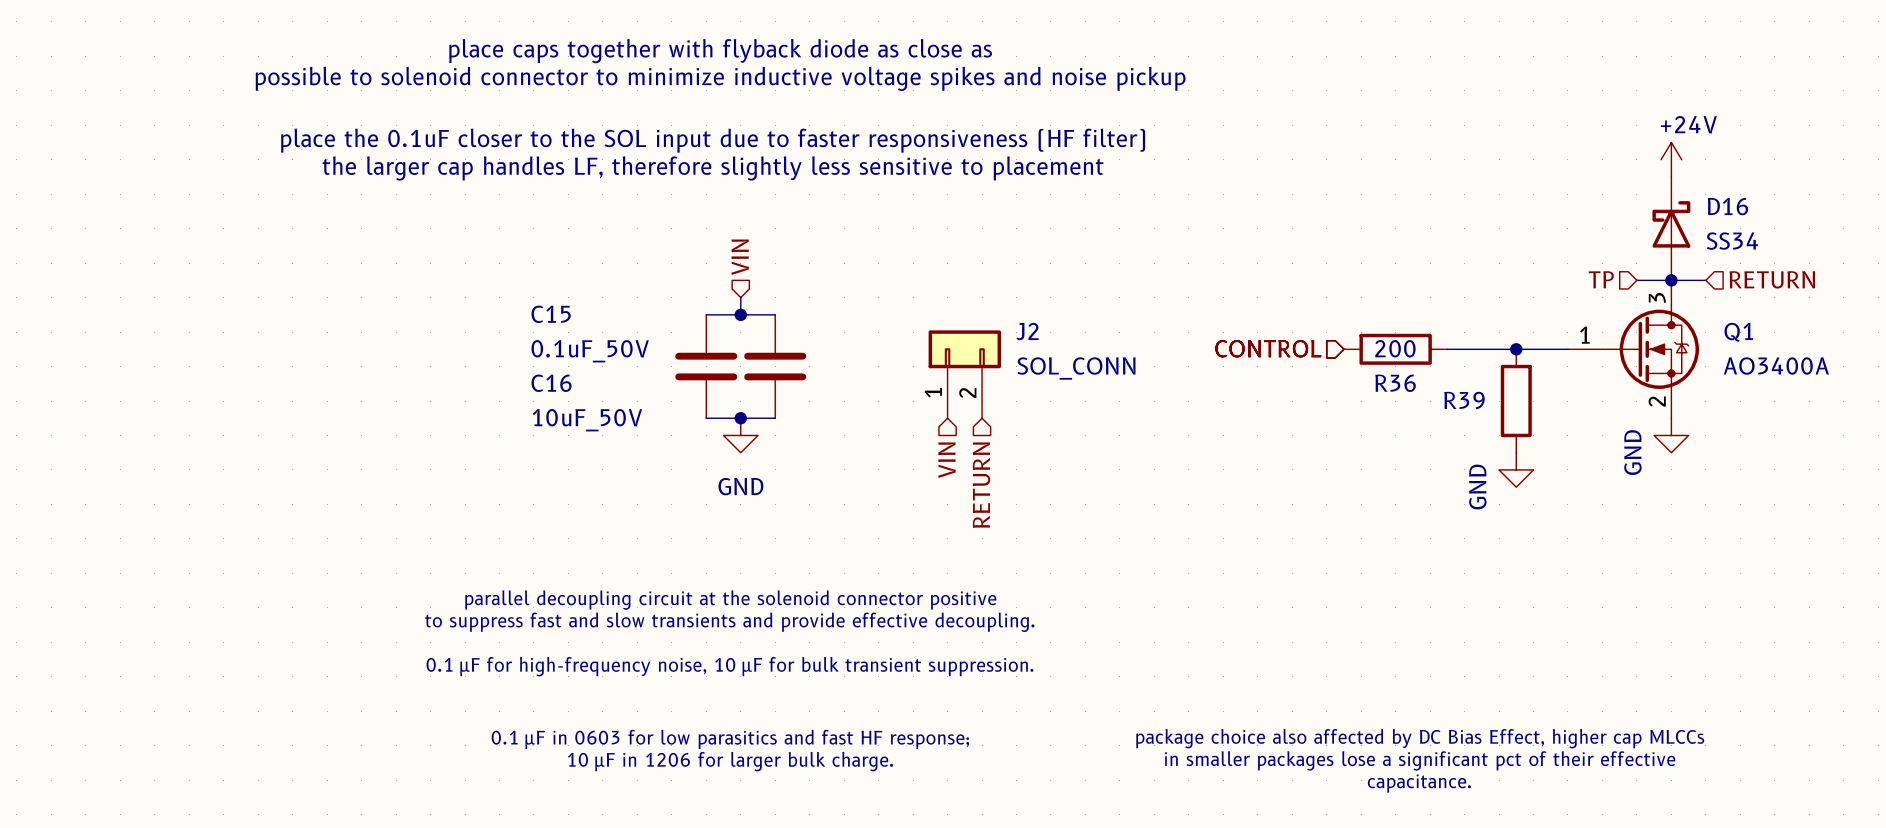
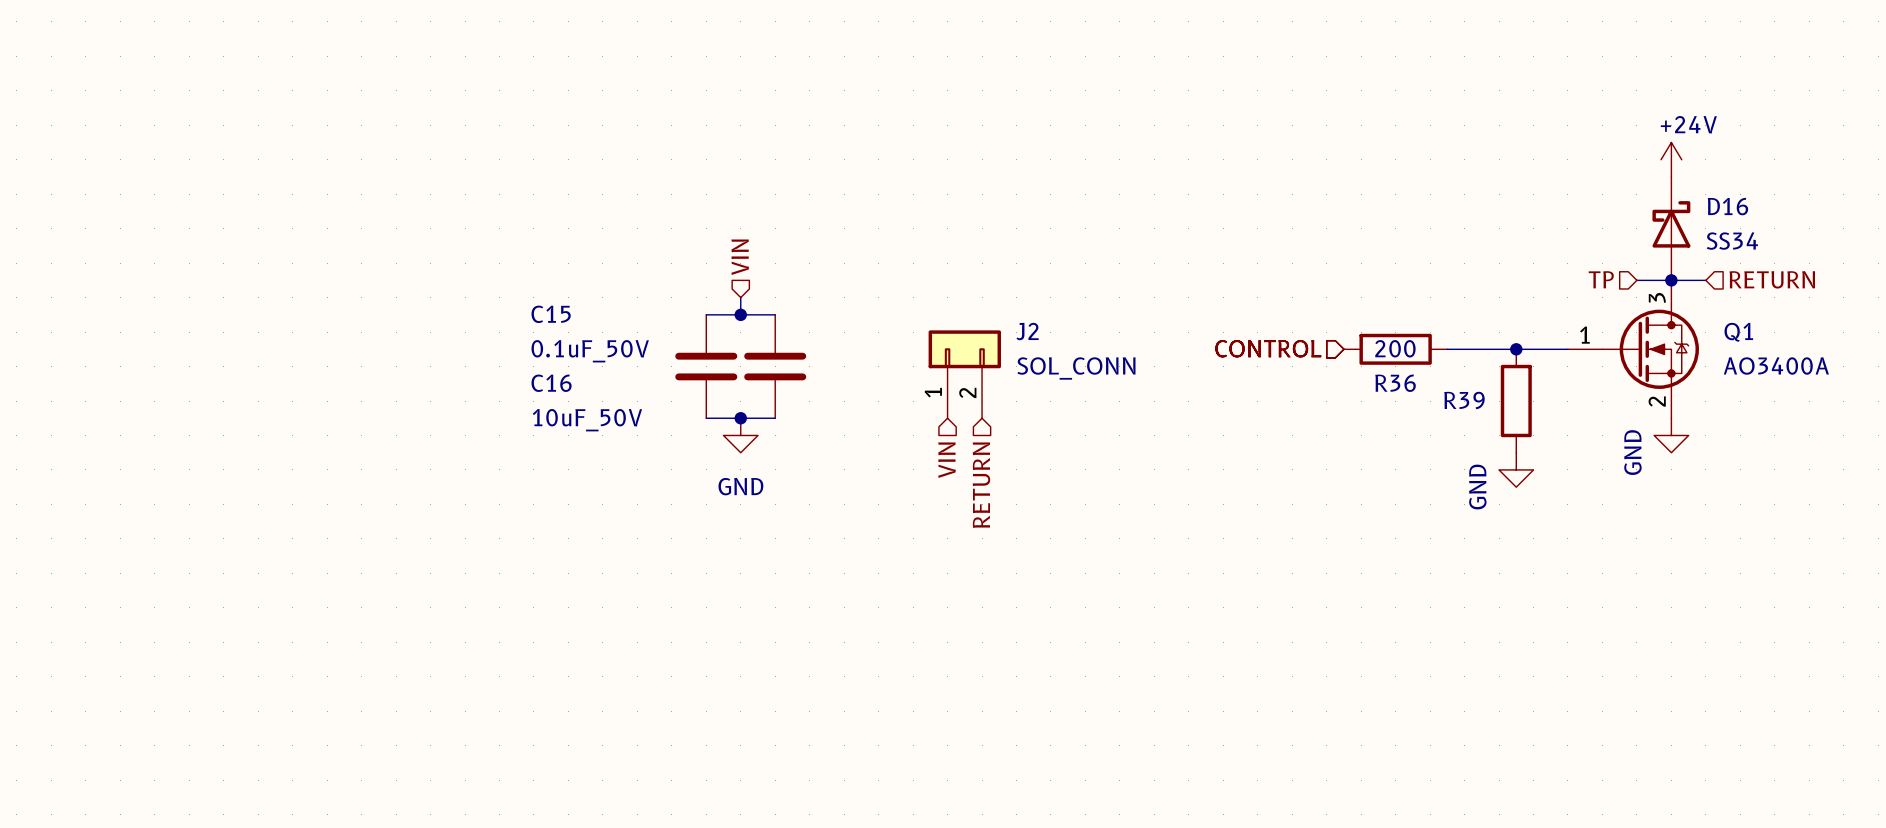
text: place caps together with flyback diode as close as (720, 51) -> none
text: possible to solenoid connector to minimize inductive voltage spikes and noise pickup (720, 78) -> none
text: place the 0.1uF closer to the SOL input due to faster responsiveness (HF filter) (713, 140) -> none
text: the larger cap handles LF, therefore slightly less sensitive to placement (713, 168) -> none
text: parallel decoupling circuit at the solenoid connector positive (730, 600) -> none
text: to suppress fast and slow transients and provide effective decoupling. (729, 622) -> none
text: 0.1 µF for high-frequency noise, 10 µF for bulk transient suppression. (729, 666) -> none
text: package choice also affected by DC Bias Effect, higher cap MLCCs (1420, 738) -> none
text: 0.1 µF in 0603 for low parasitics and fast HF response; (730, 739) -> none
text: in smaller packages lose a significant pct of their effective (1420, 760) -> none
text: 10 µF in 1206 for larger bulk charge. (730, 761) -> none
text: capacitance. (1419, 783) -> none

